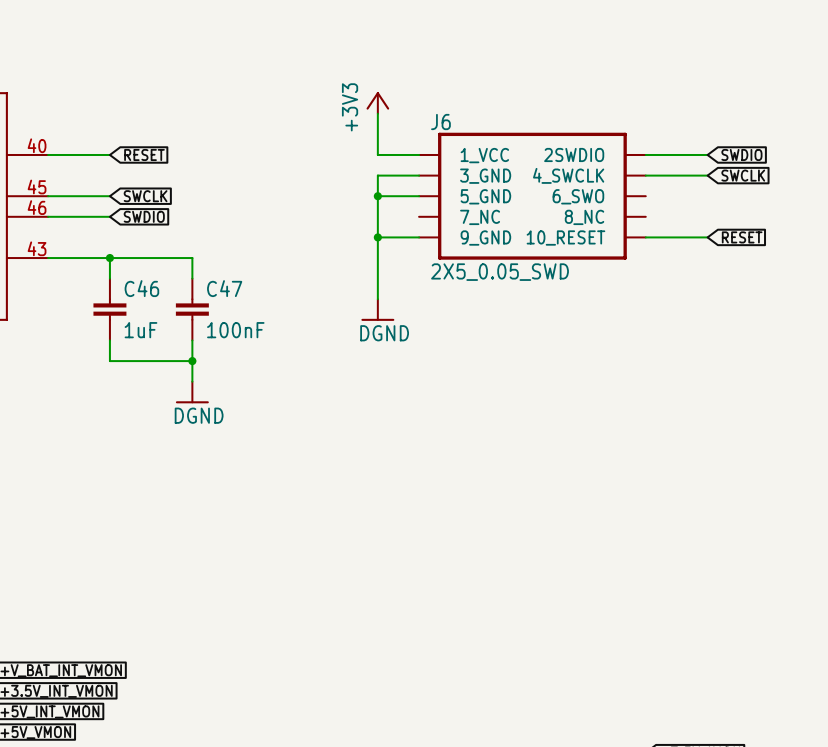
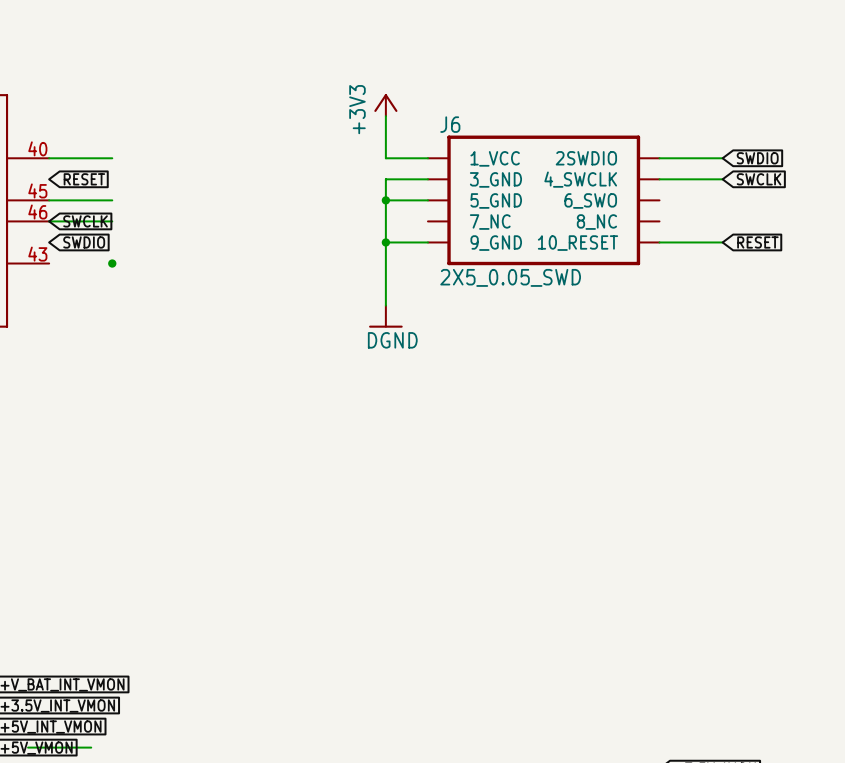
global label position: RESET (144, 154) -> RESET (84, 179)
global label position: SWCLK (145, 196) -> SWCLK (85, 221)
global label position: SWDIO (144, 216) -> SWDIO (84, 242)
wire: (48, 258) (192, 258) (192, 278) -> none
wire: (109, 258) (109, 278) -> none
C46: 1uF (109, 309) -> none
C47: 100nF (192, 309) -> none
wire: (109, 340) (109, 361) (192, 361) -> none
wire: (192, 340) (192, 381) -> none
junction: (192, 361) -> none
power symbol: DGND (192, 392) -> none
wire: none -> (28, 747) (91, 747)

